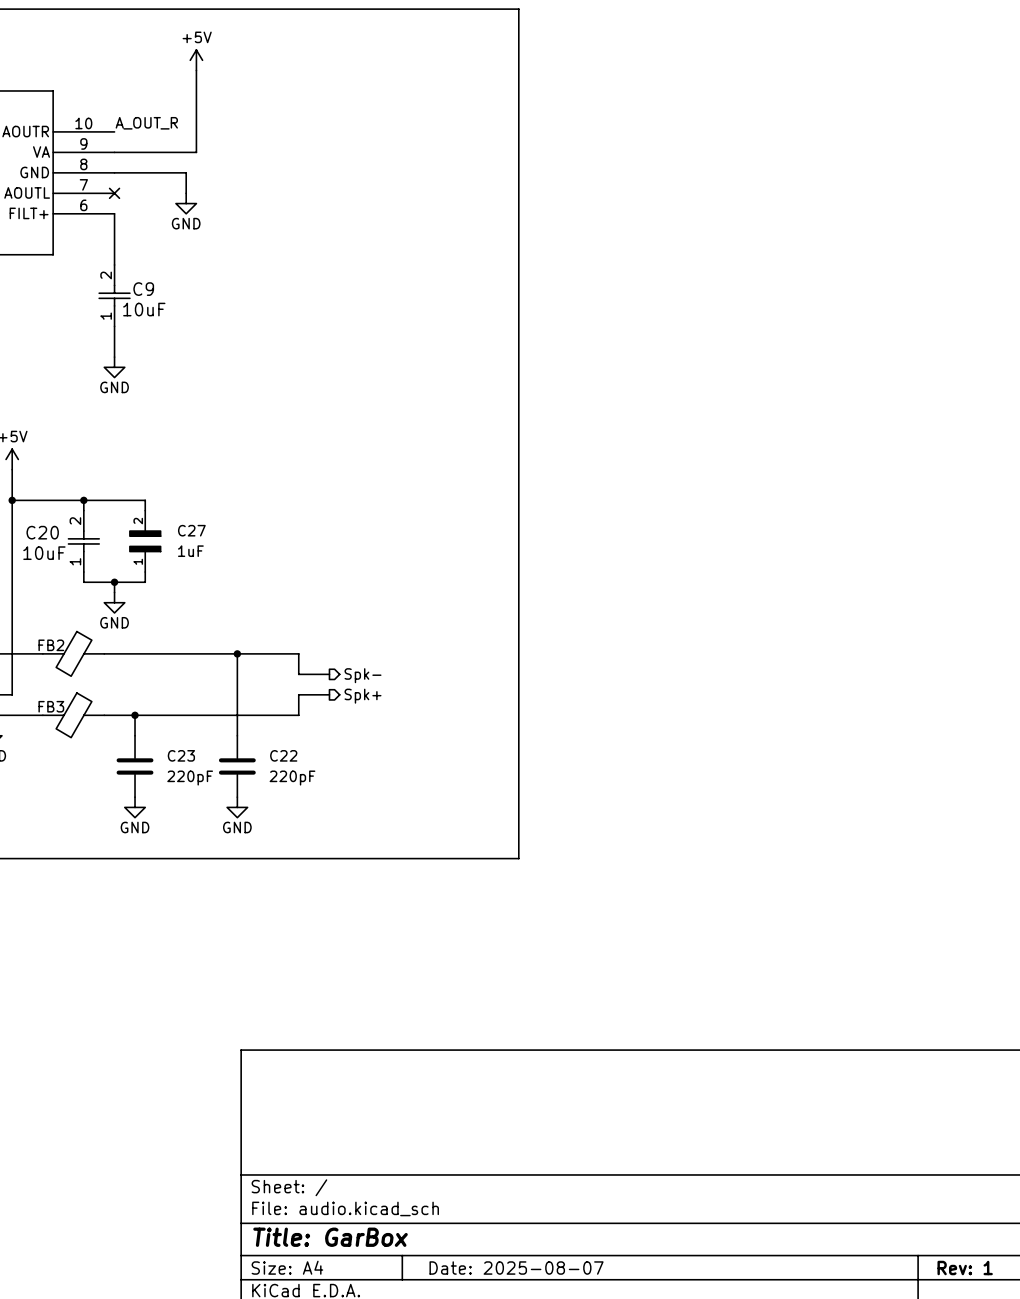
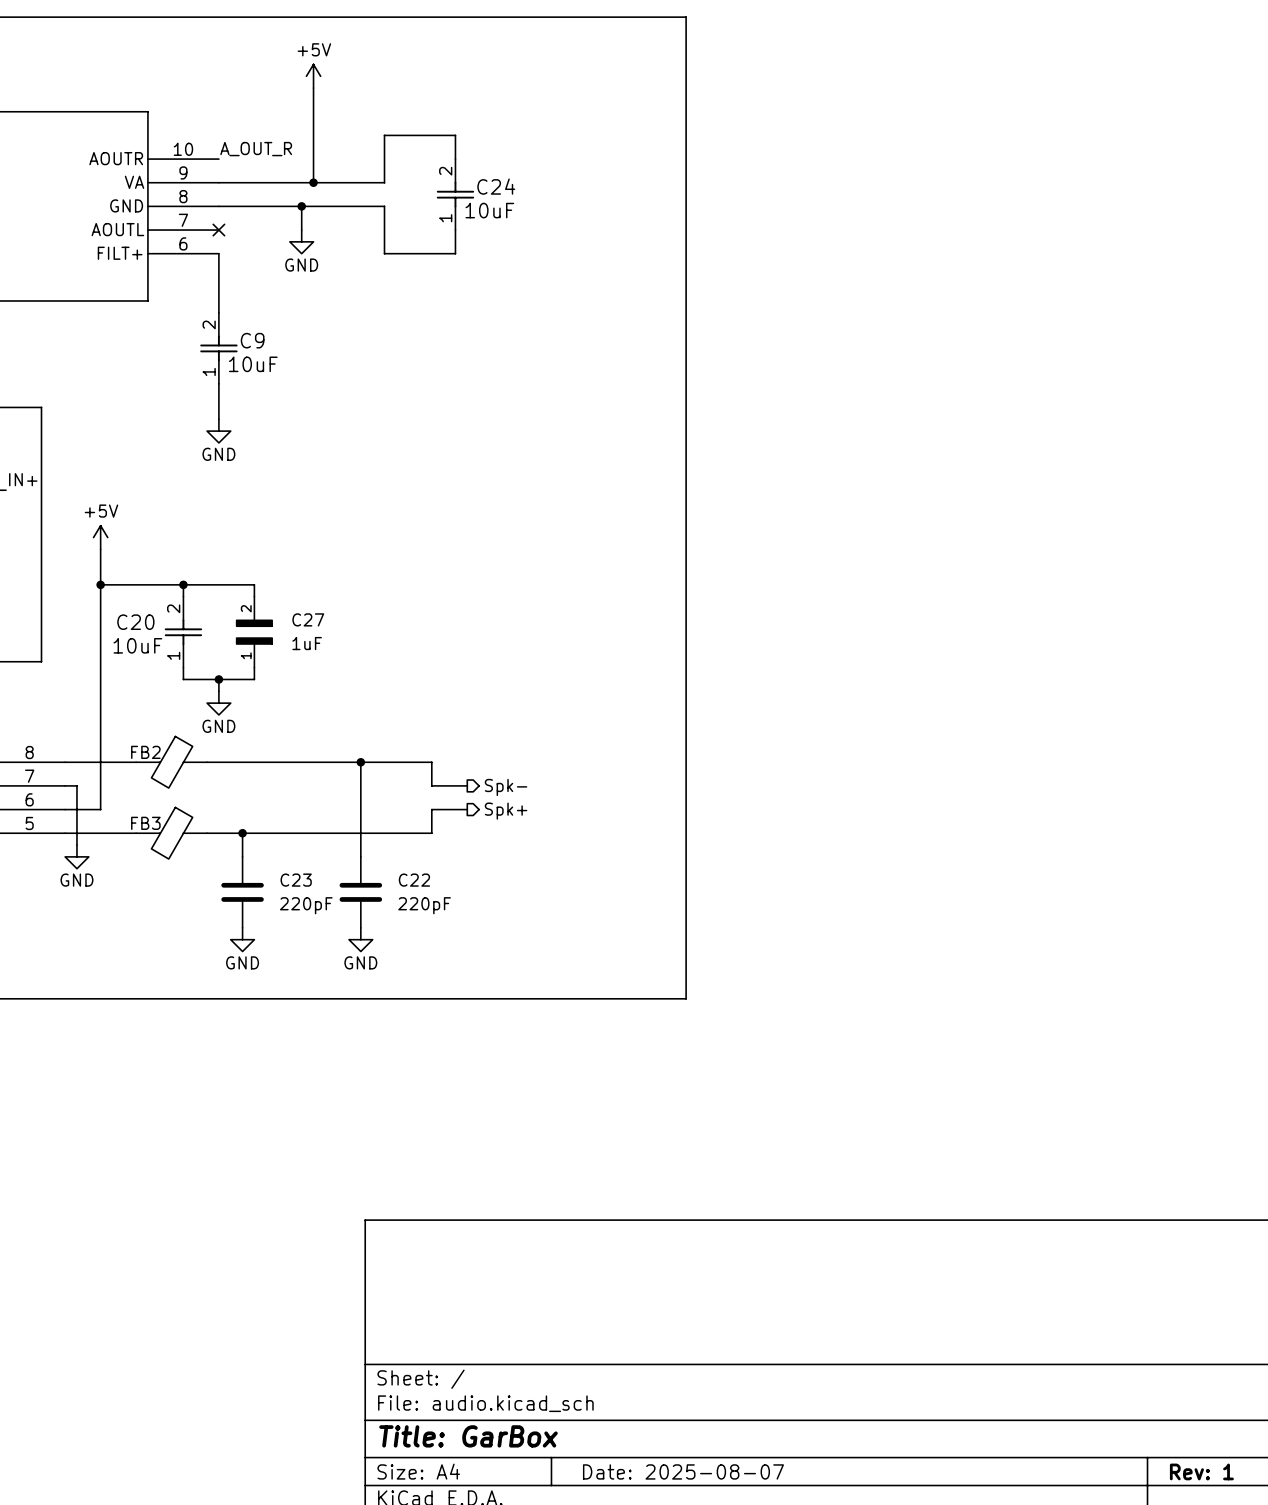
wire: none -> (455, 159) (455, 135) (384, 135) (384, 182) (313, 182)
junction: none -> (313, 182)
C24: none -> 10uF (455, 194)
wire: none -> (301, 206) (384, 206) (384, 253) (455, 253) (455, 230)
junction: none -> (301, 206)

